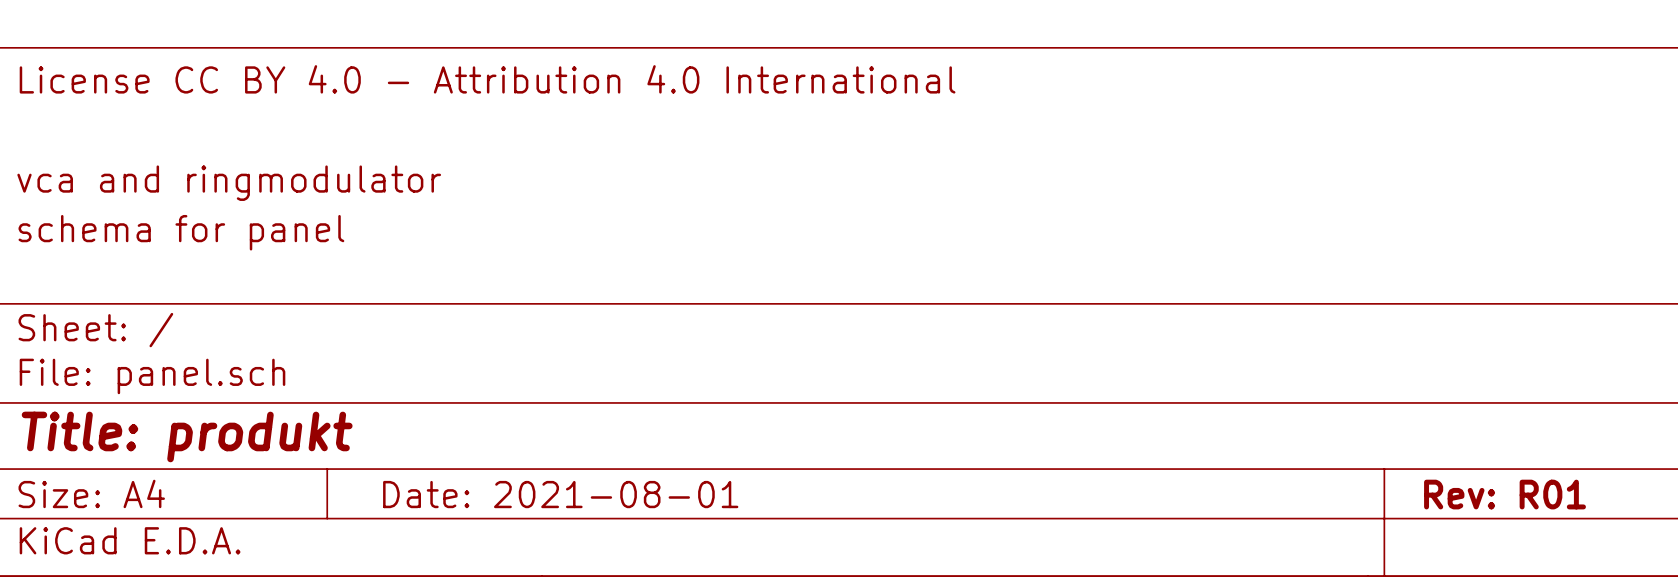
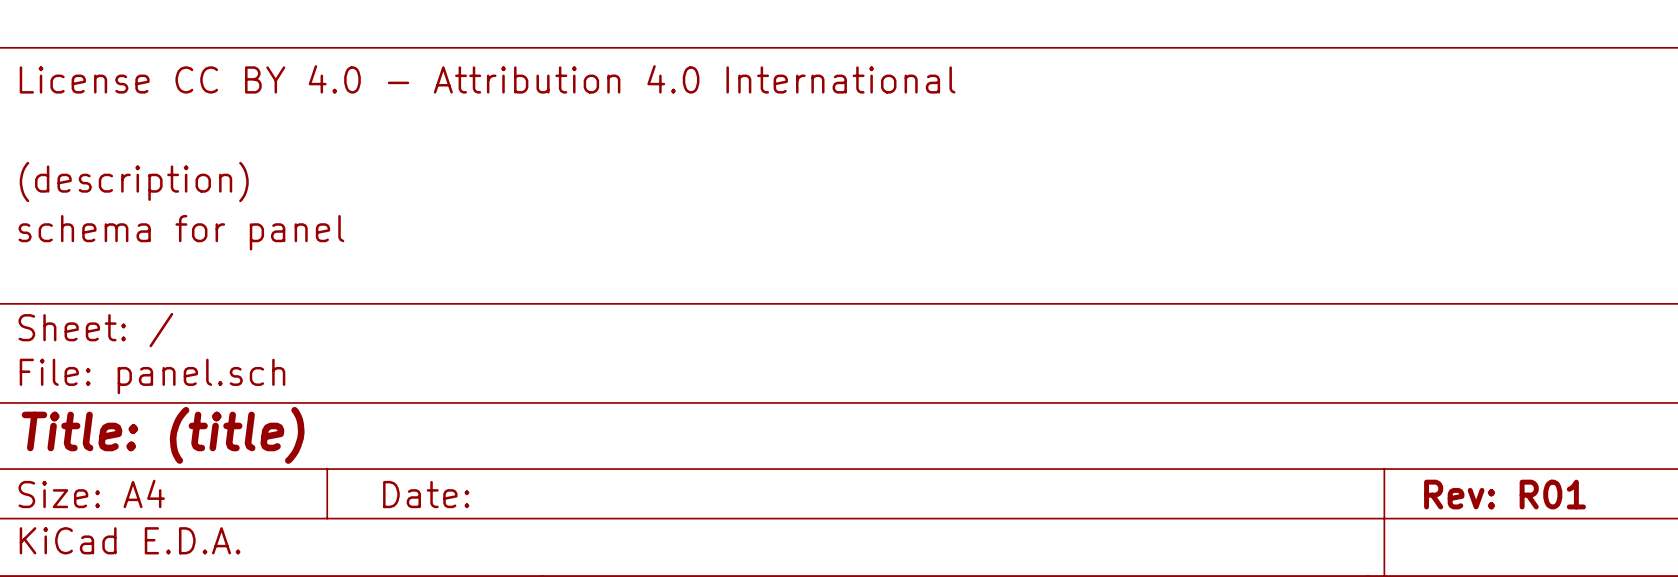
title block: vca and ringmodulator (229, 183) -> (description) (134, 182)
title block: Title: produkt (187, 436) -> Title: (title) (163, 435)
title block: Date: 2021-08-01 (560, 494) -> Date: (426, 494)

